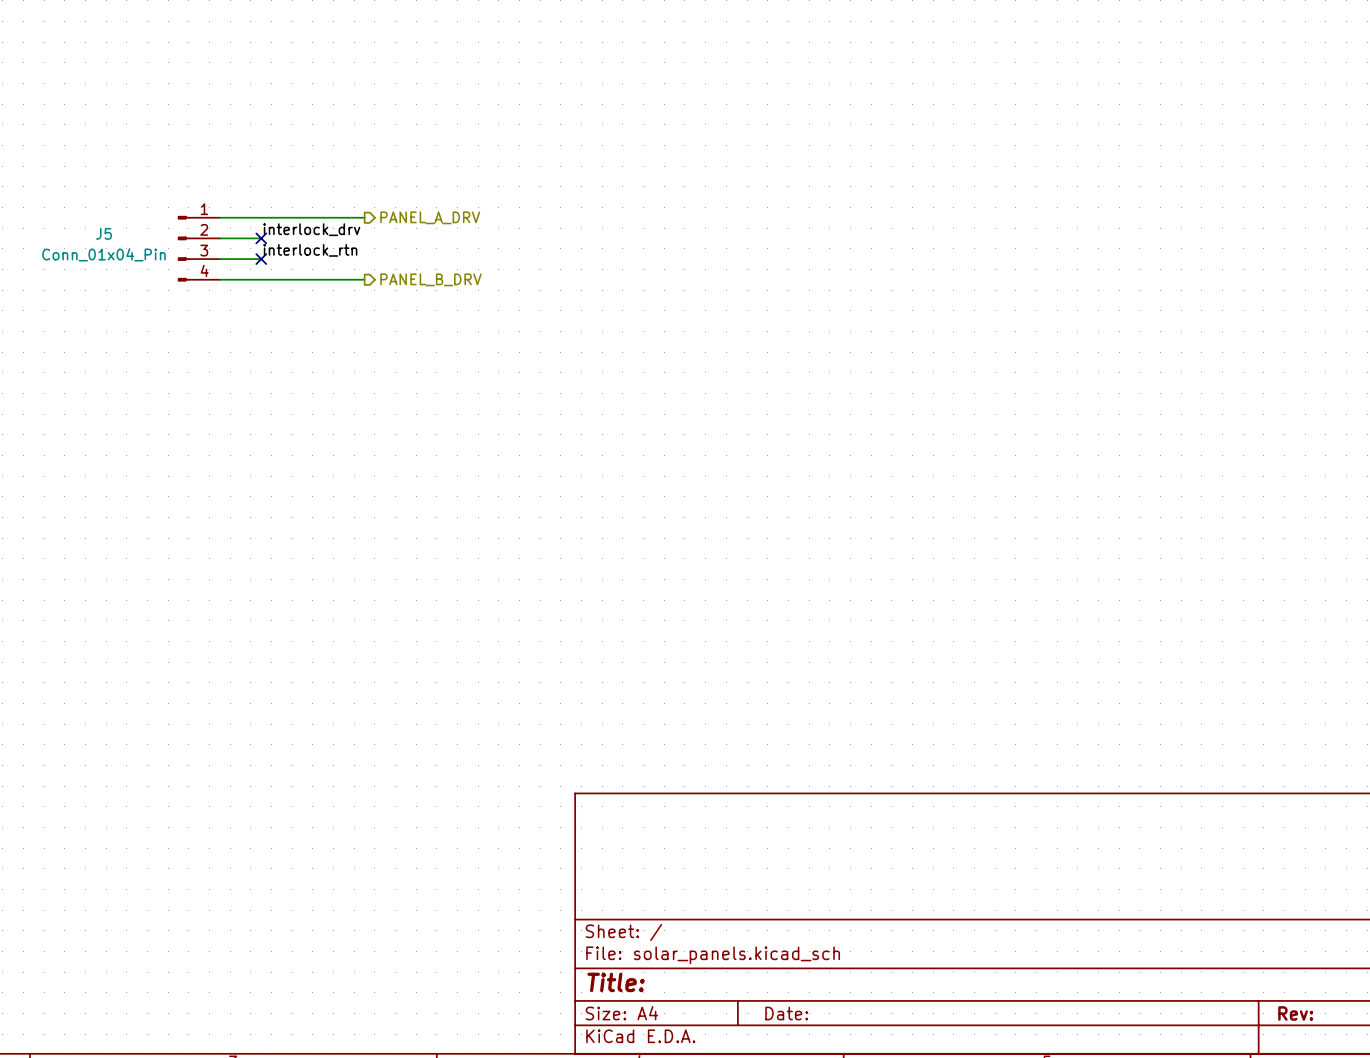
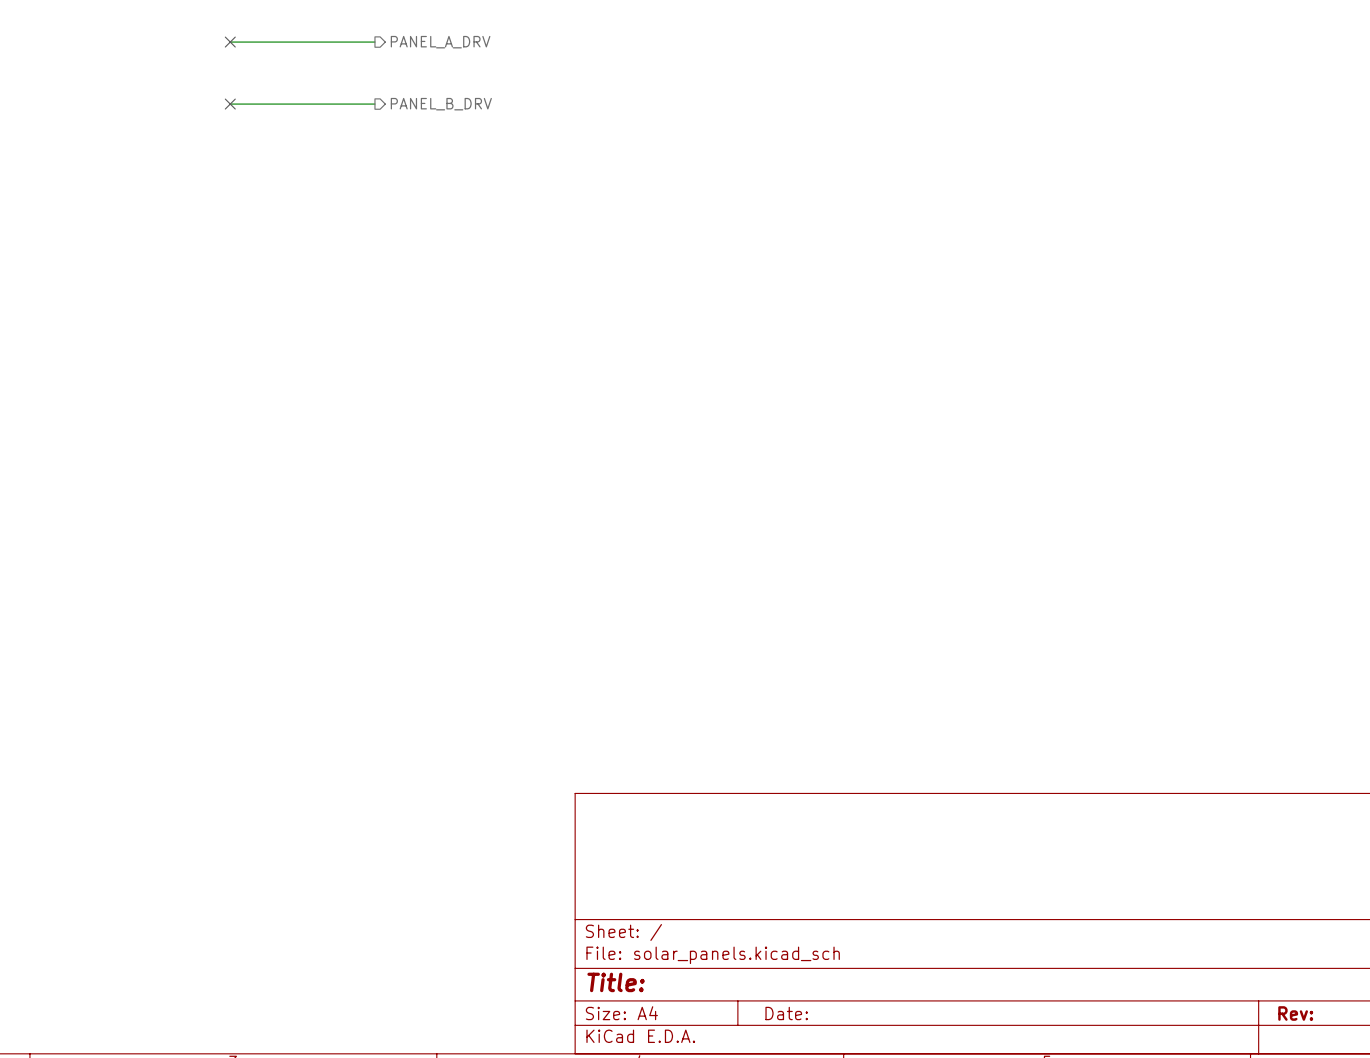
no-connect mark: none -> (230, 42)
no-connect mark: none -> (230, 104)
wire: (219, 217) (364, 217) -> (230, 42) (374, 42)
hierarchical label position: PANEL_A_DRV (430, 217) -> PANEL_A_DRV (440, 42)
label: interlock_drv (311, 229) -> none
wire: (219, 238) (261, 238) -> none
no-connect mark: (261, 238) -> none
J5: Conn_01x04_Pin (198, 248) -> none
label: interlock_rtn (310, 250) -> none
wire: (219, 259) (261, 259) -> none
no-connect mark: (261, 259) -> none
wire: (219, 279) (364, 279) -> (230, 104) (374, 104)
hierarchical label position: PANEL_B_DRV (430, 279) -> PANEL_B_DRV (441, 104)

